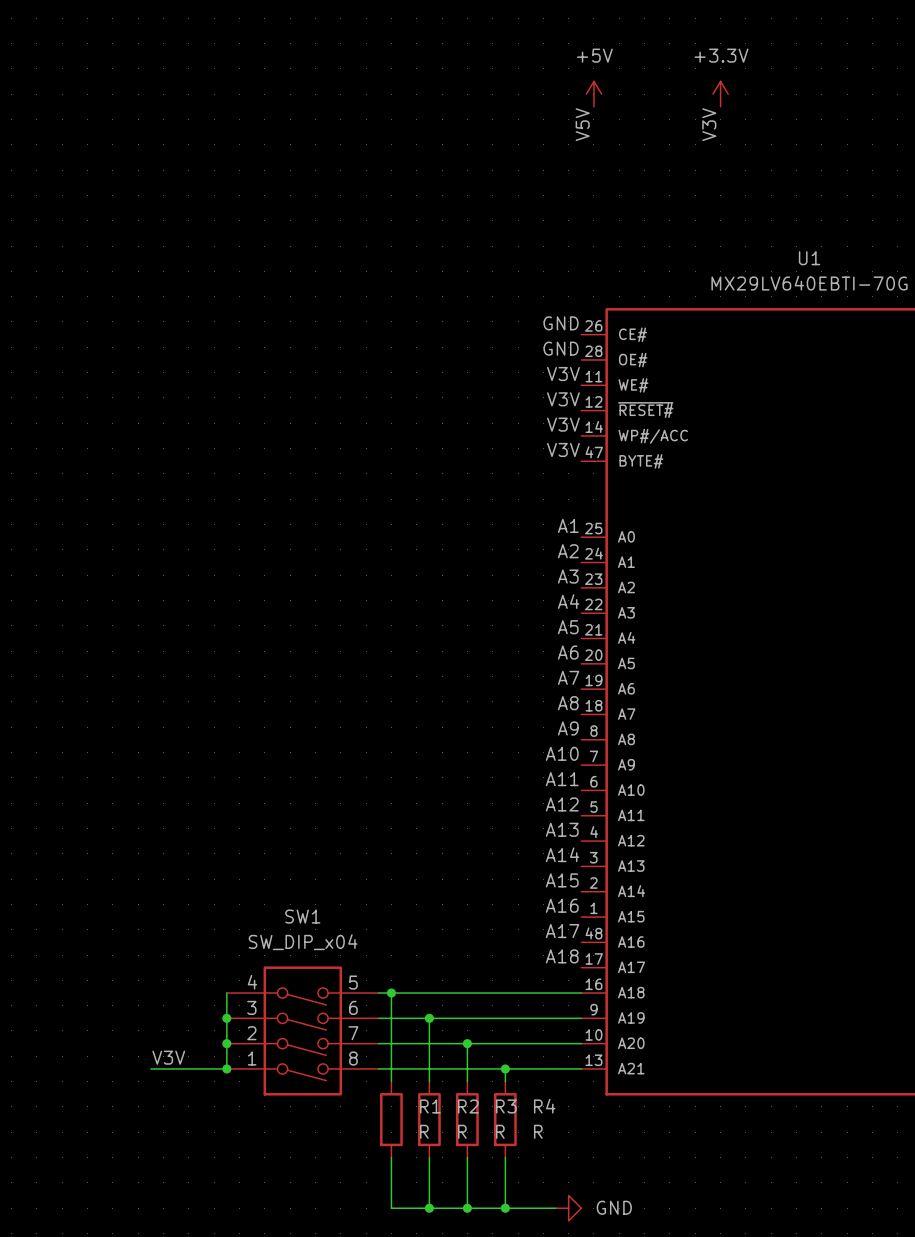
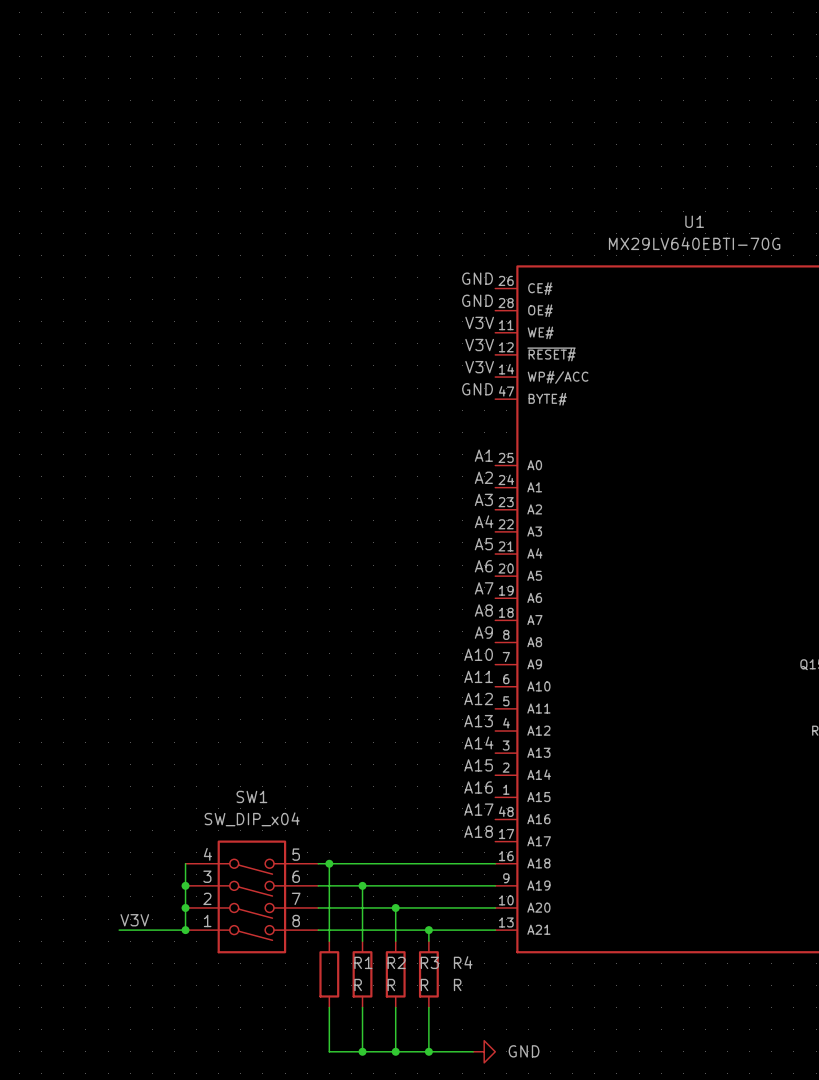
power symbol: +5V (593, 94) -> none
power symbol: +3.3V (720, 94) -> none
label: V5V (582, 124) -> none
label: V3V (709, 124) -> none
label: V3V (563, 449) -> GND (477, 389)

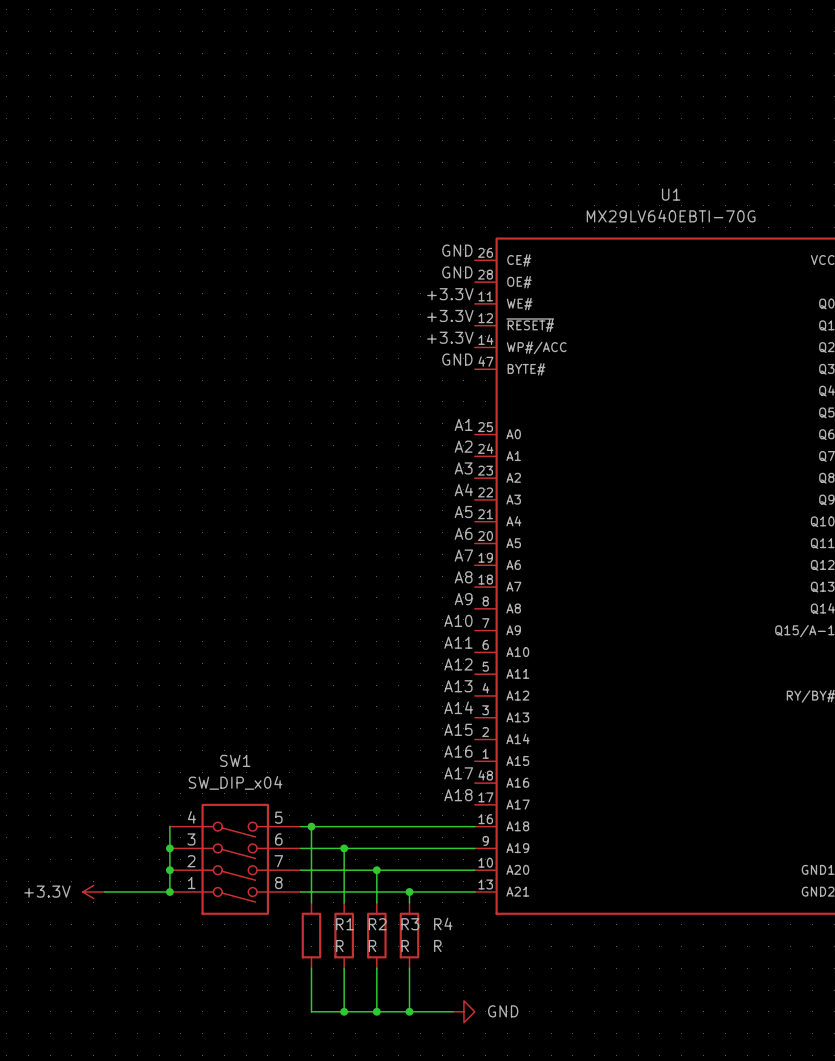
label: V3V (479, 322) -> +3.3V (450, 294)
label: V3V (479, 345) -> +3.3V (450, 315)
label: V3V (479, 367) -> +3.3V (450, 337)
label: V3V (134, 920) -> none
power symbol: none -> +3.3V (93, 891)

